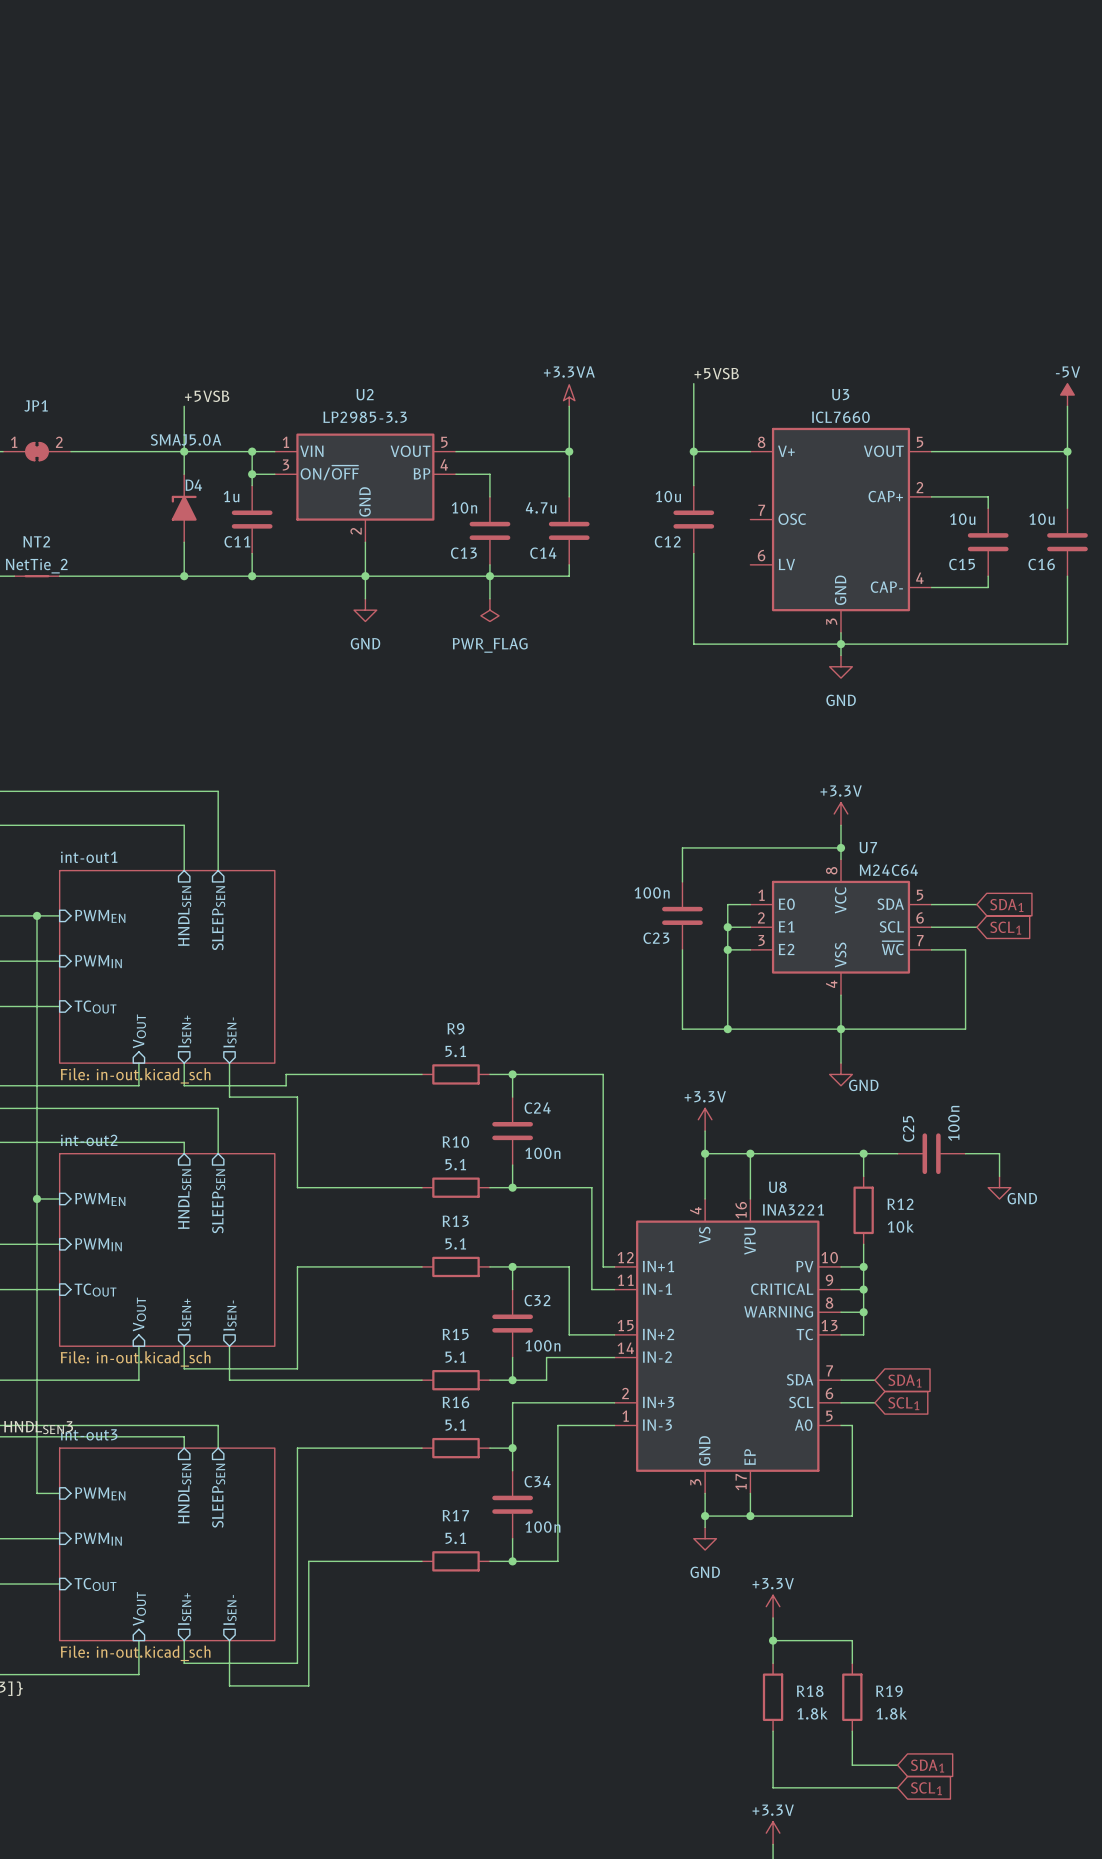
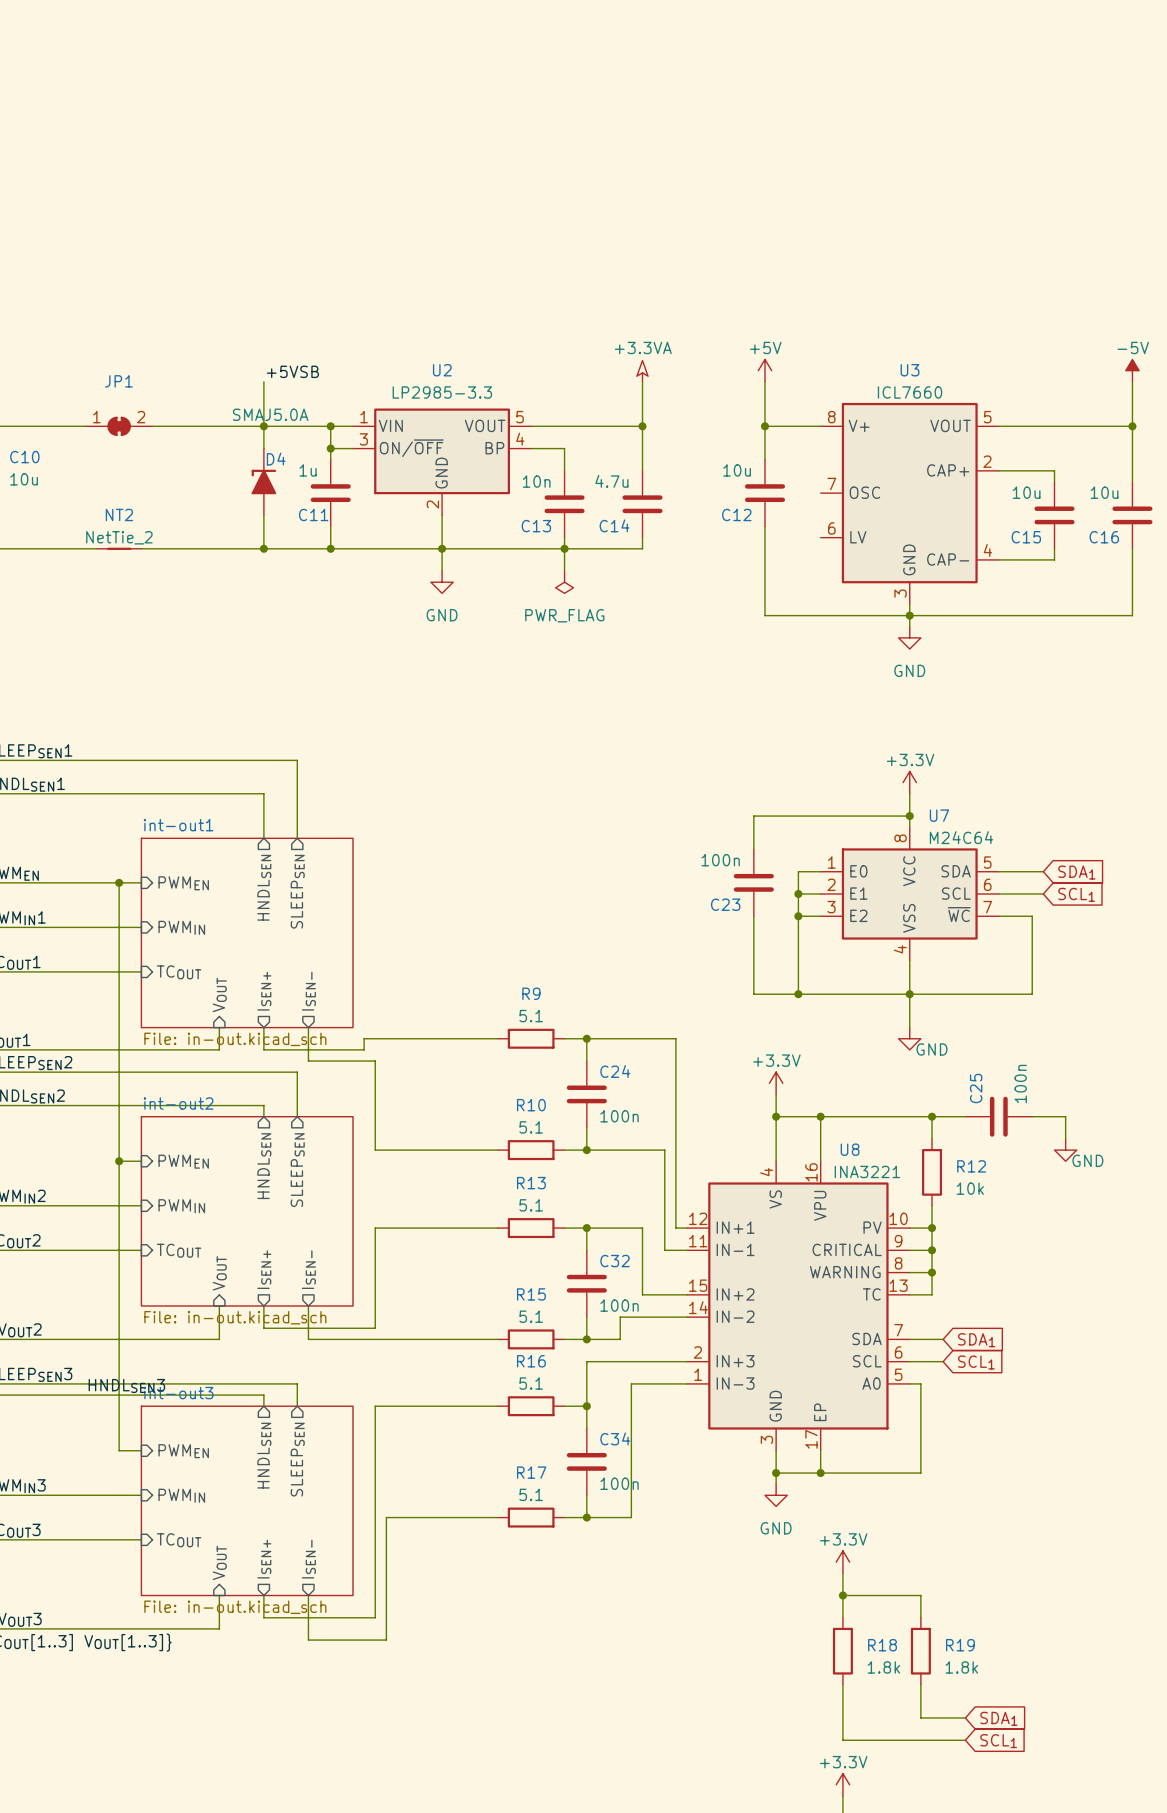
label: +5VSB (716, 373) -> none
power symbol: none -> +5V (764, 370)

